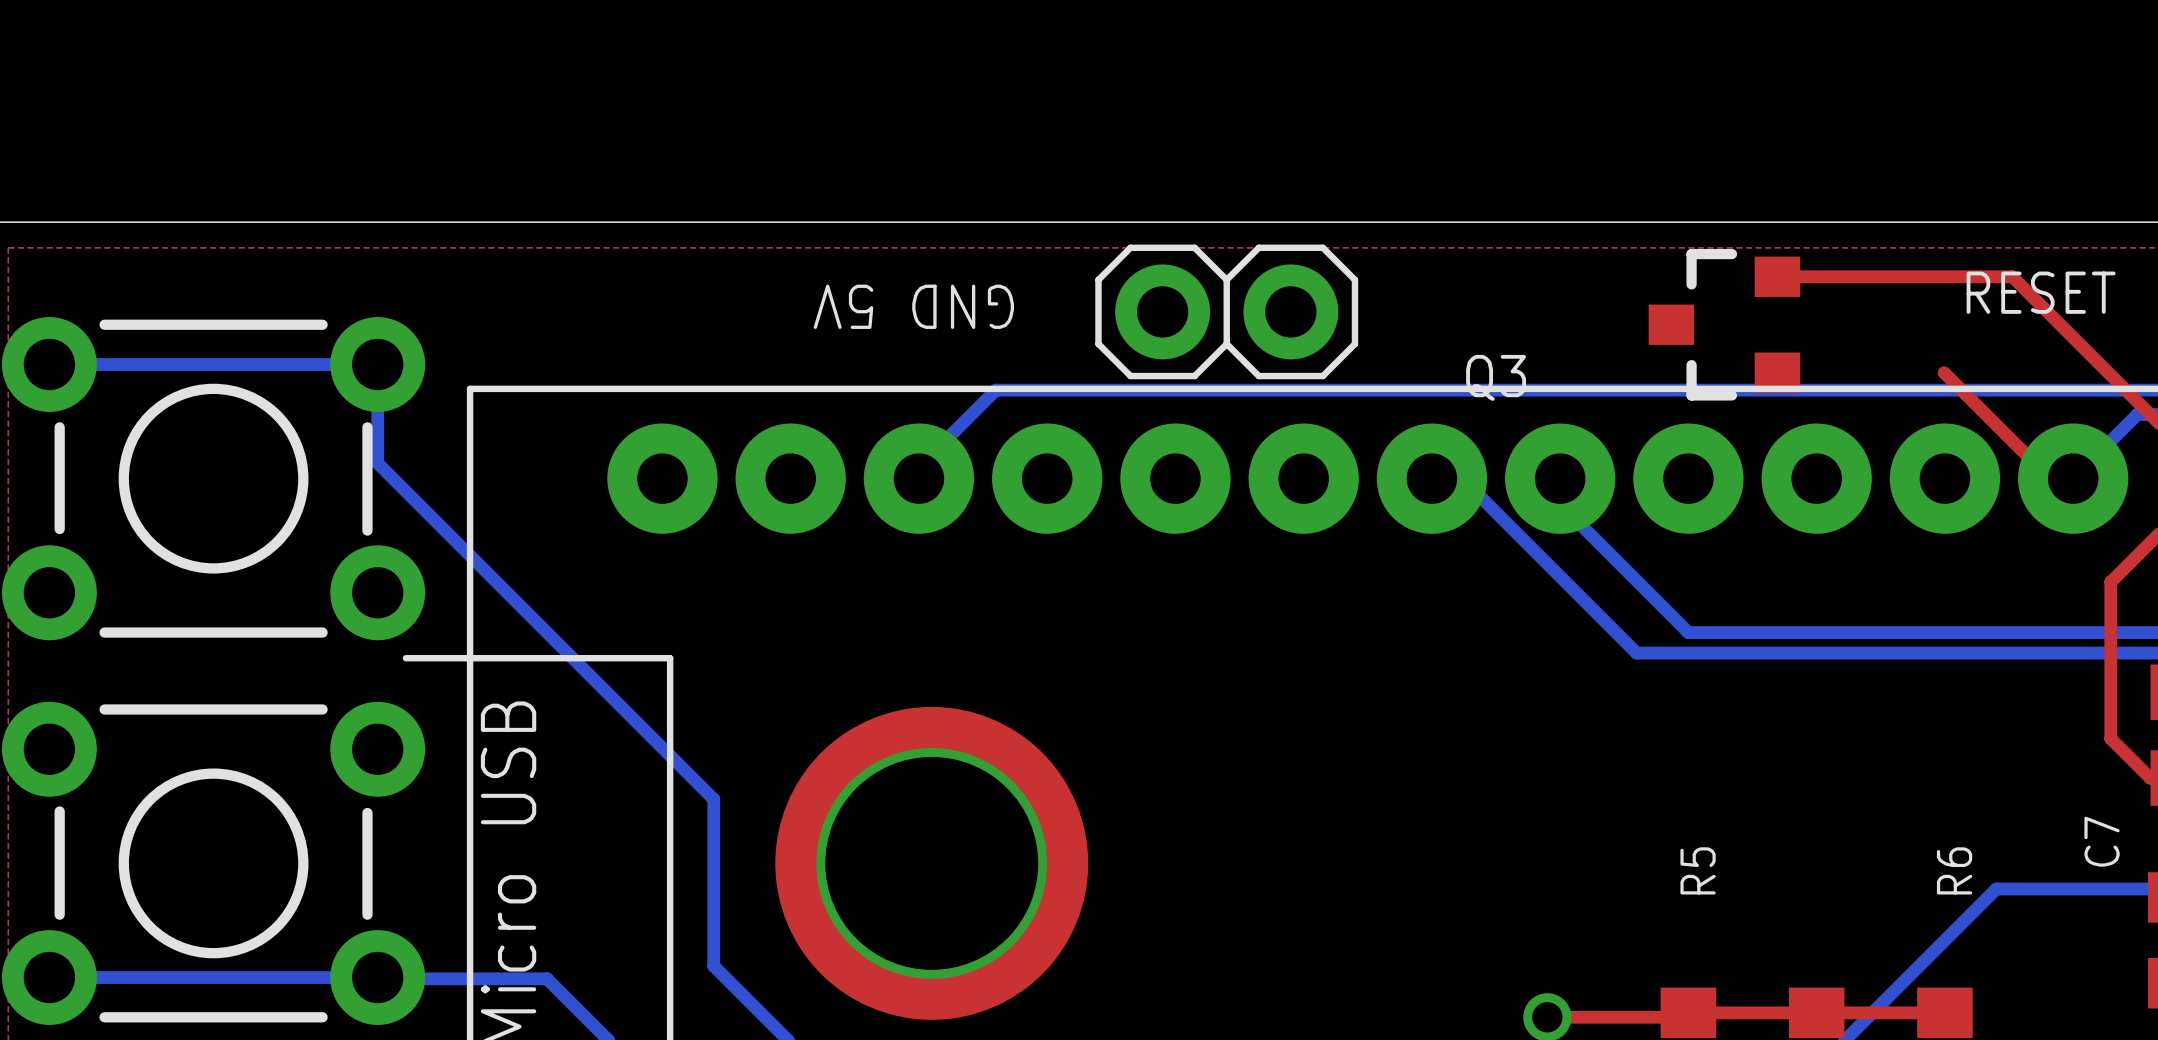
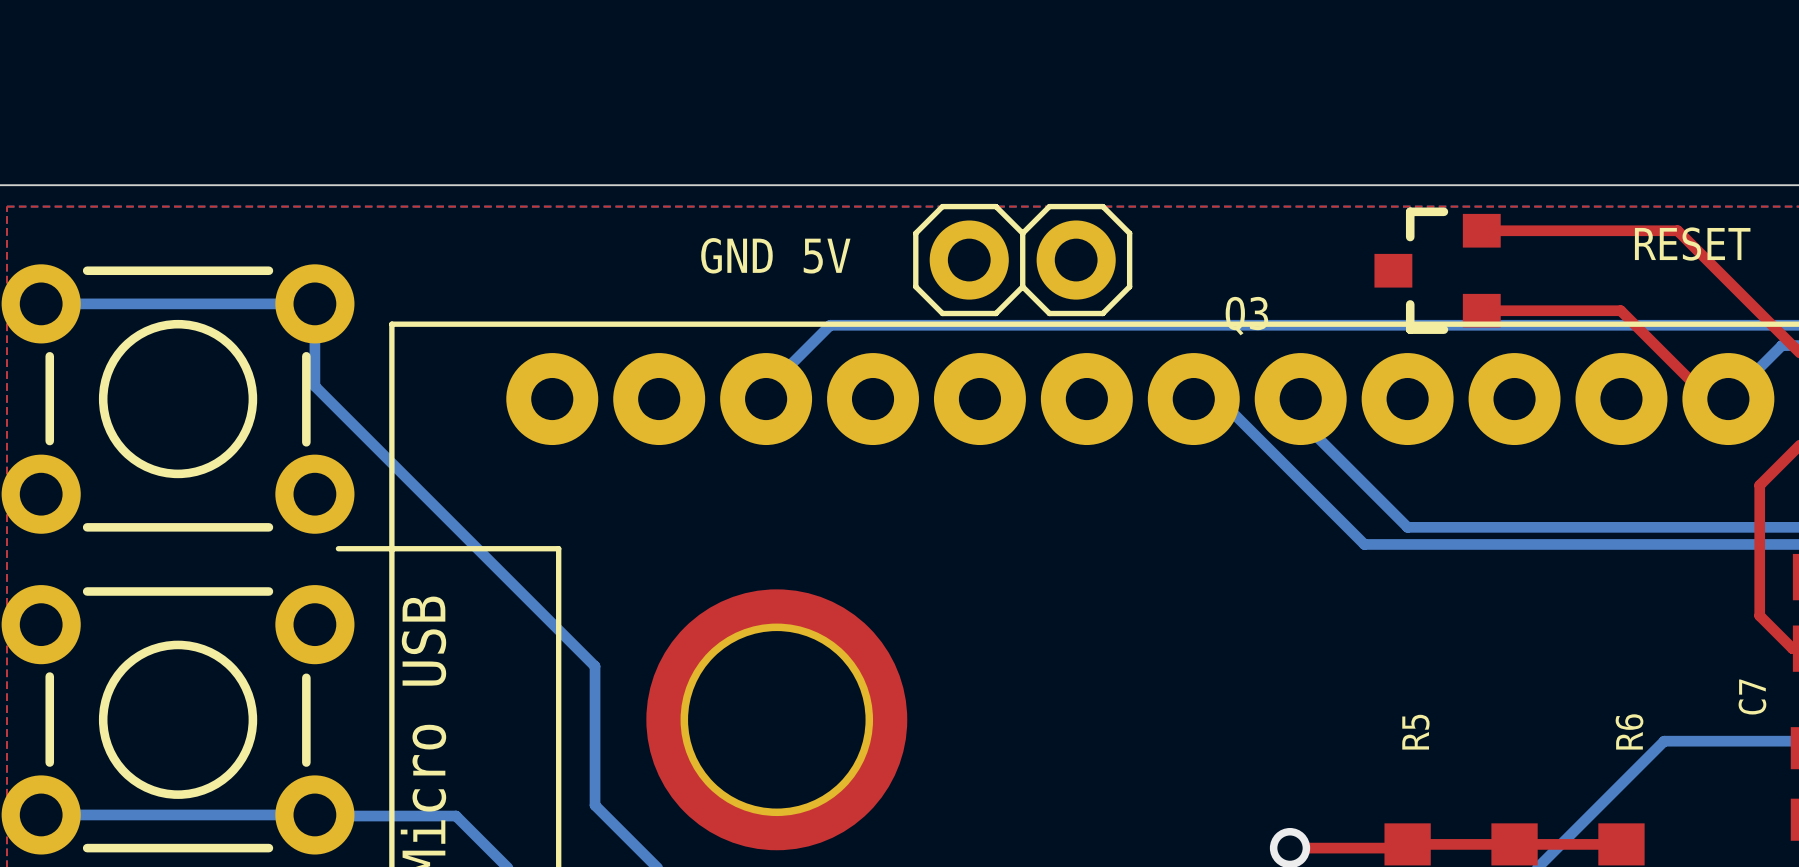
text rotation: 0° (913, 306) -> 180° (775, 255)
top track: none -> (1481, 310) (1620, 310)

